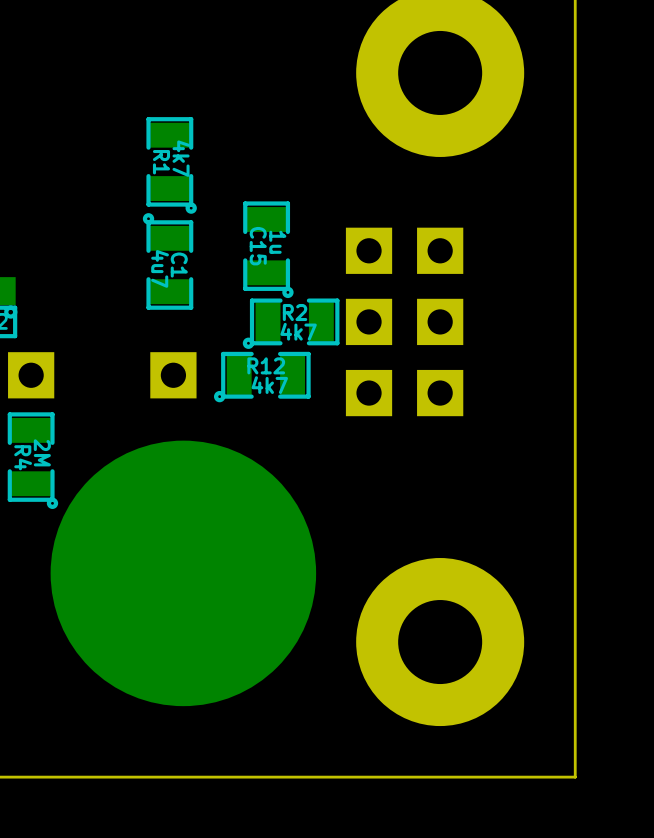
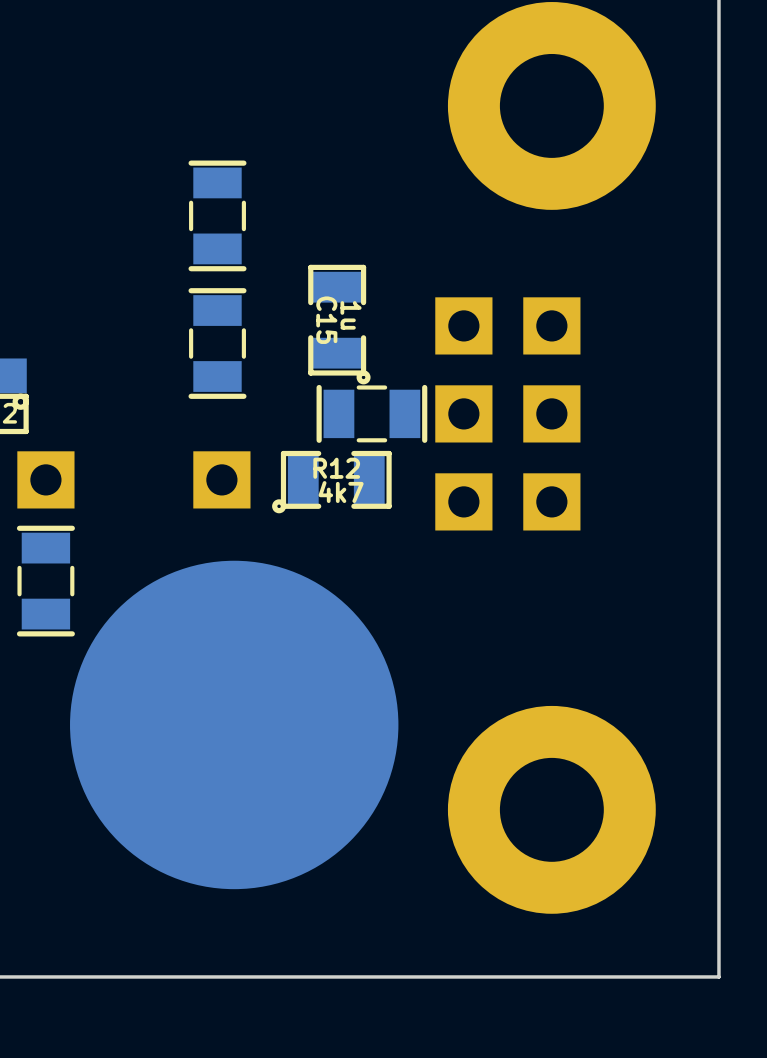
part: none -> (217, 215)
R1: 4k7 (171, 165) -> none
C1: 4u7 (168, 261) -> none
part: none -> (217, 343)
part: none -> (371, 413)
R2: 4k7 (291, 323) -> none
part: none -> (45, 581)
R4: 2M (32, 460) -> none

